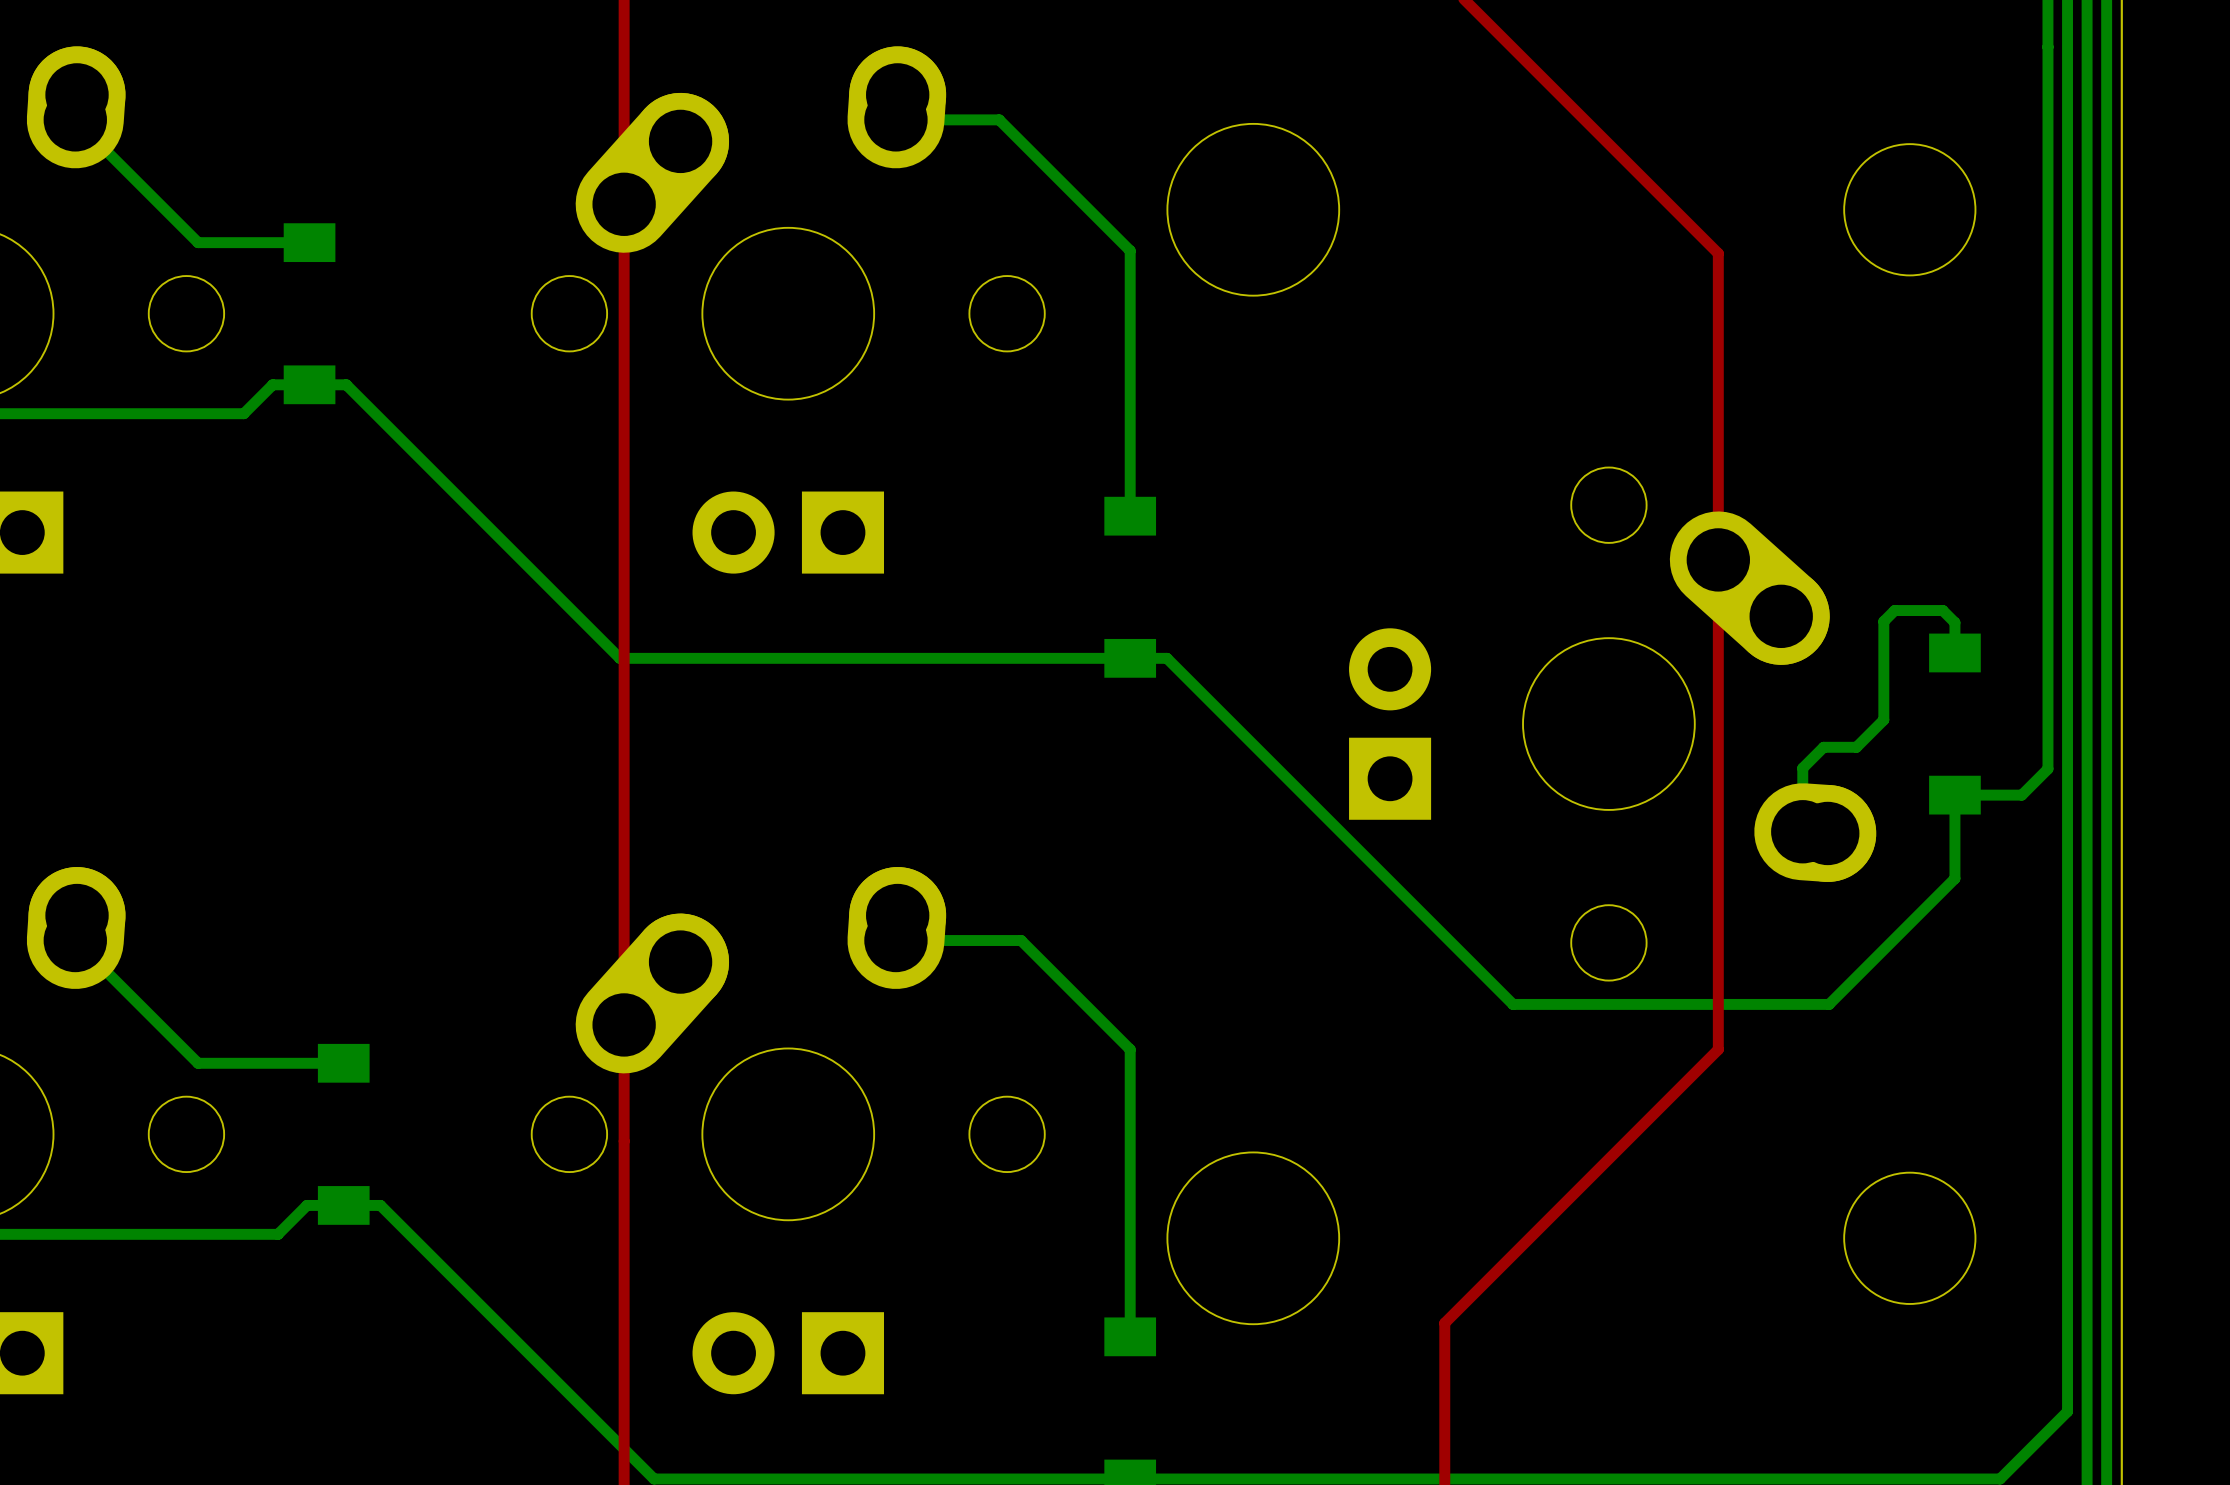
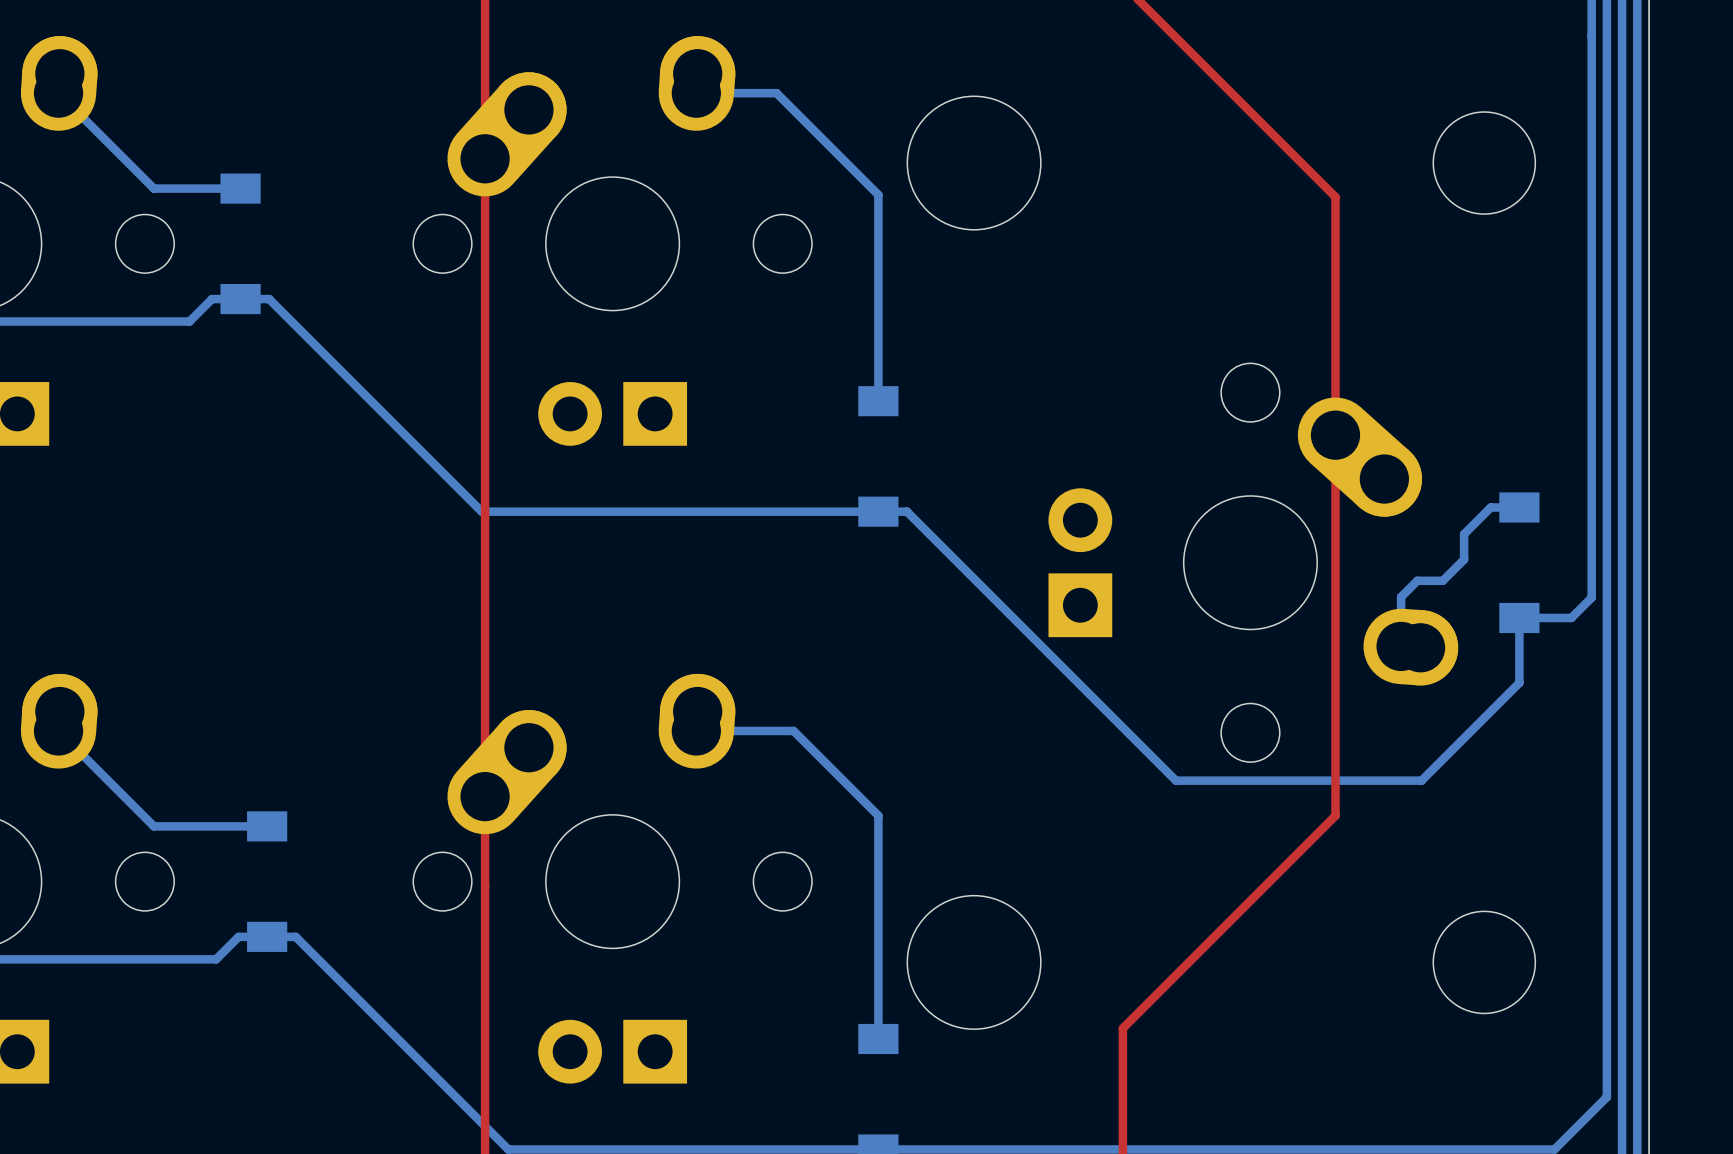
bottom track: (1954, 652) (1954, 622) (1942, 610) (1894, 610) (1883, 621) (1883, 687) -> (1519, 507) (1490, 507) (1464, 534)

